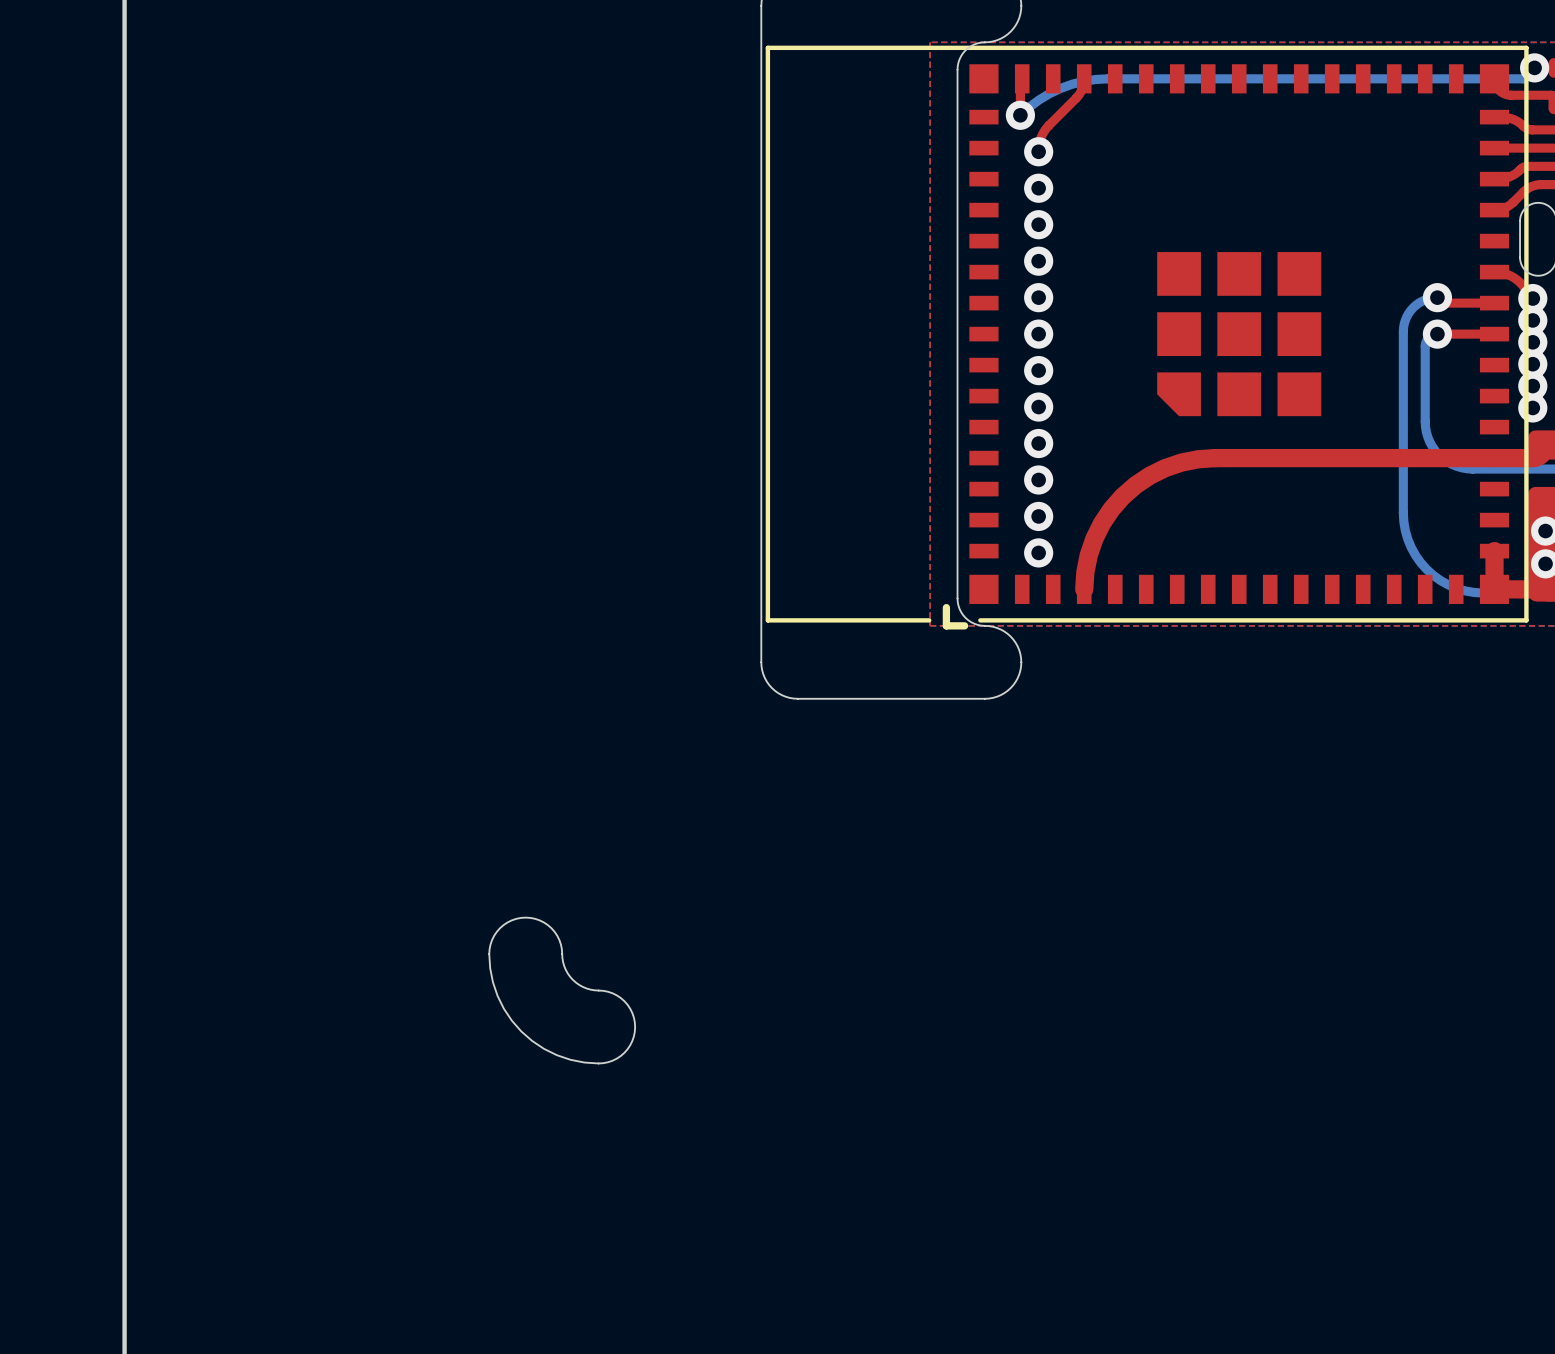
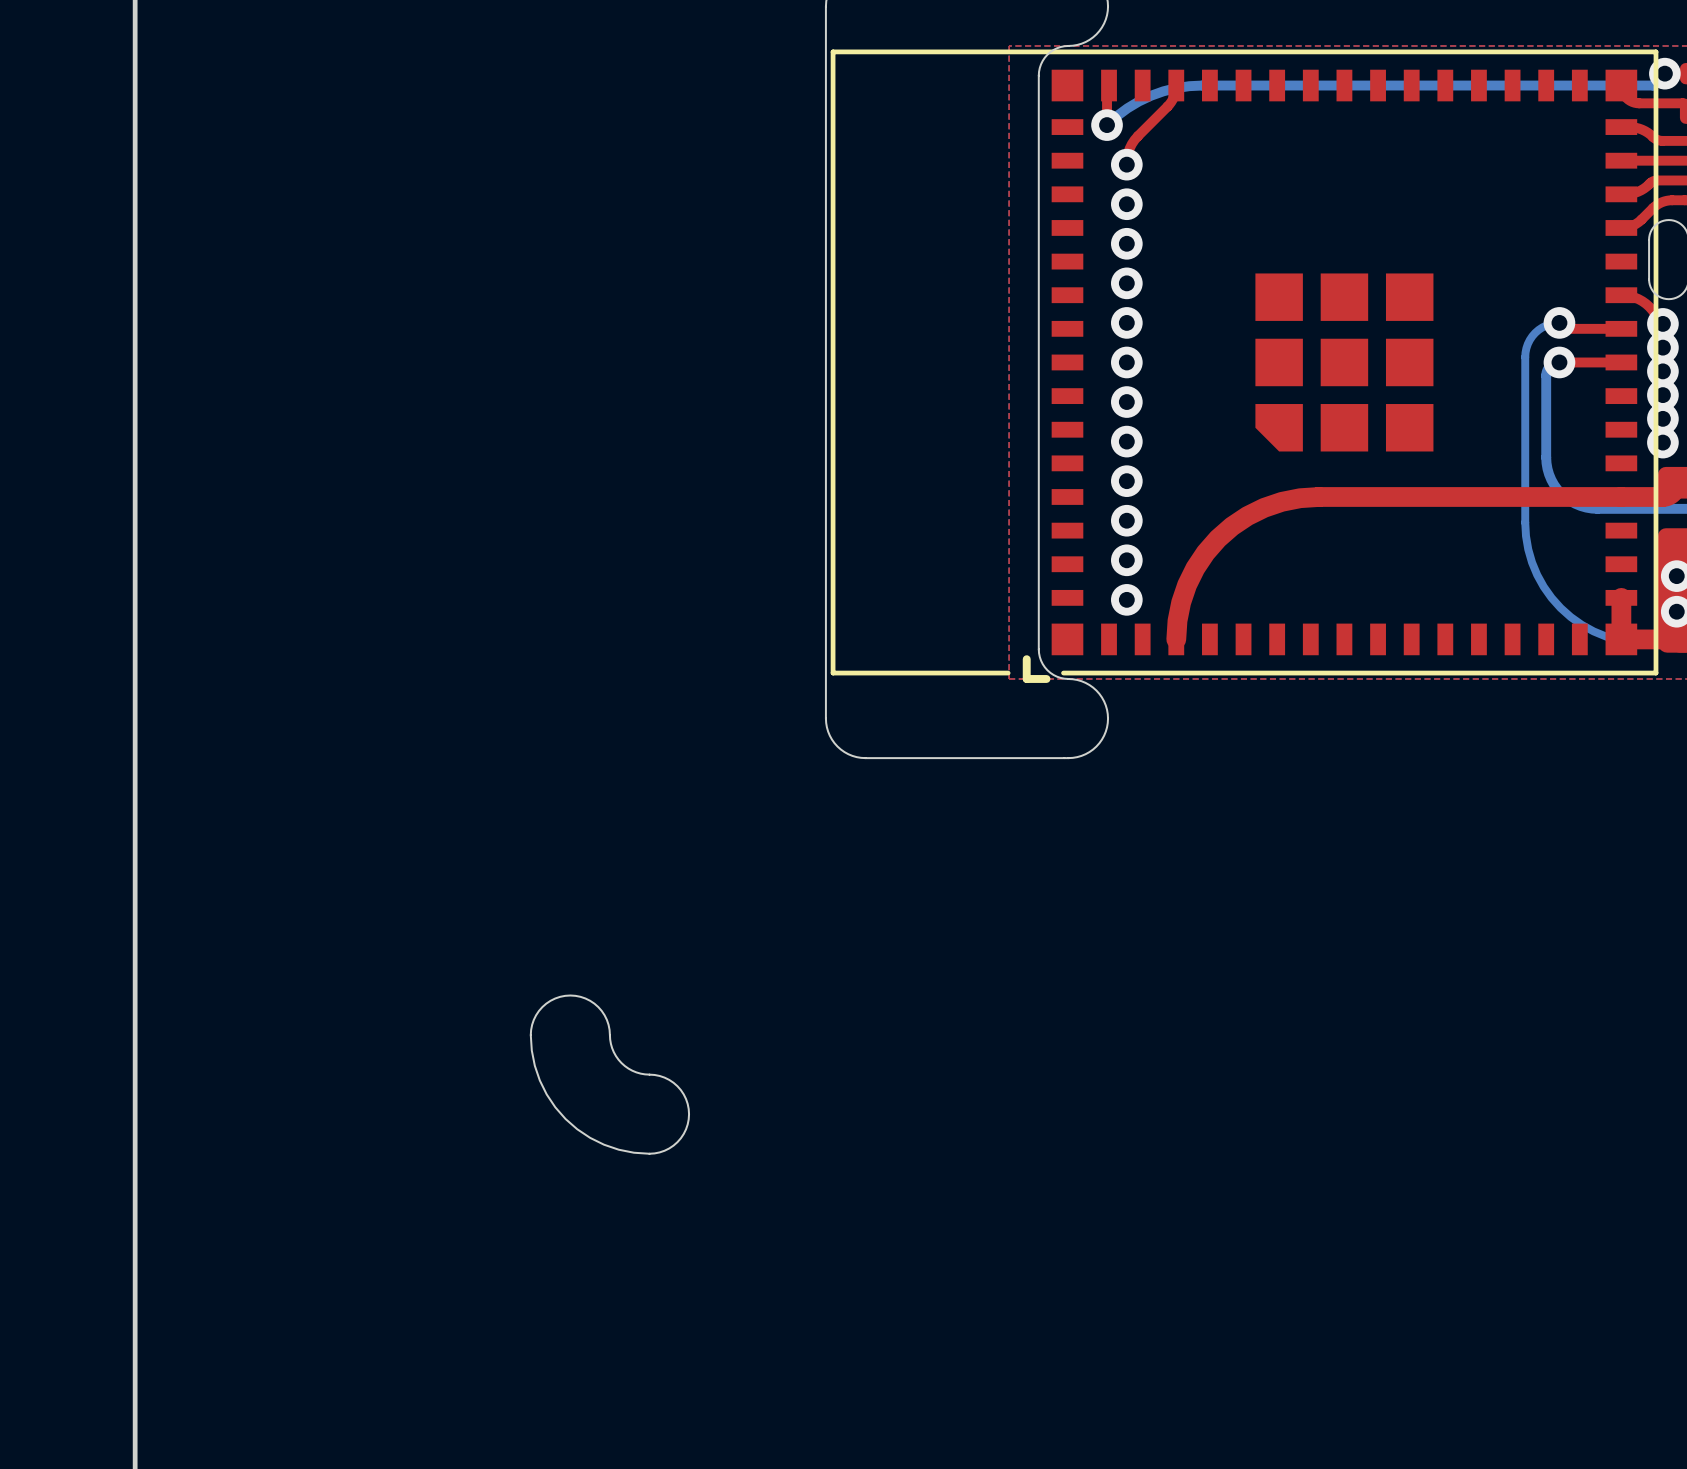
bottom track: (1437, 297) (1426, 299) (1416, 305) (1408, 313) (1403, 327) (1403, 512) (1405, 530) (1415, 555) (1426, 569) (1440, 580) (1457, 588) (1474, 592) (1517, 593) -> (1559, 322) (1546, 325) (1538, 329) (1529, 340) (1525, 352) (1525, 522) (1528, 549) (1532, 562) (1543, 586) (1551, 597) (1570, 617) (1581, 624) (1606, 636) (1632, 642) (1646, 643)

